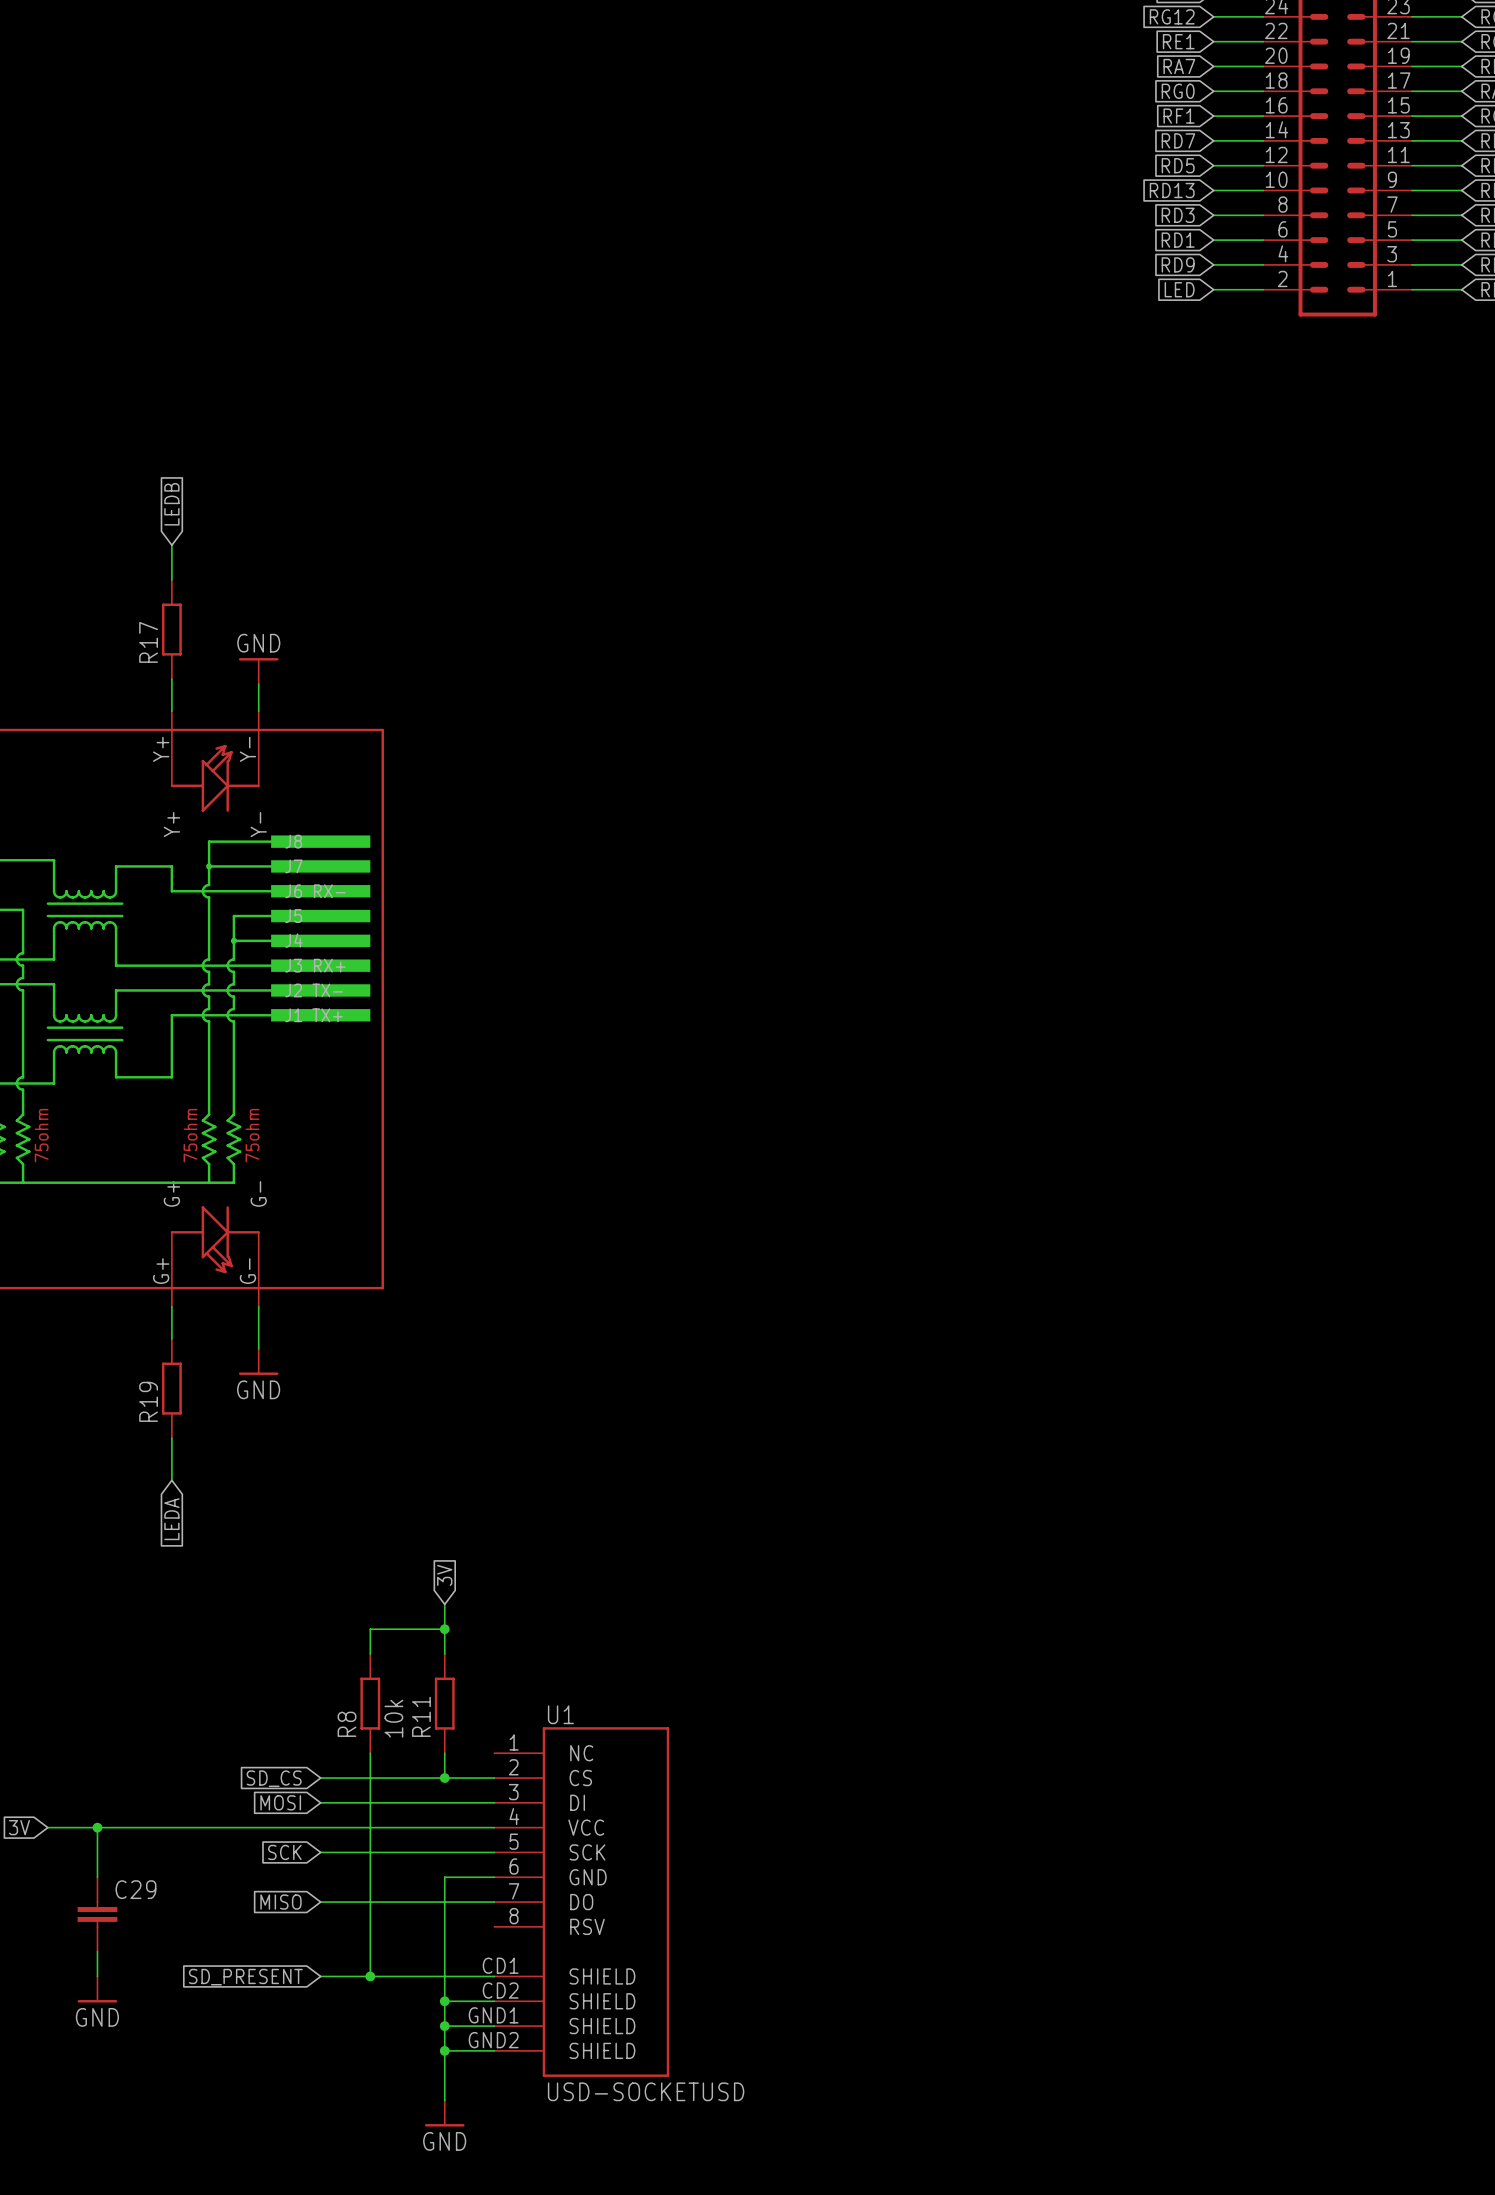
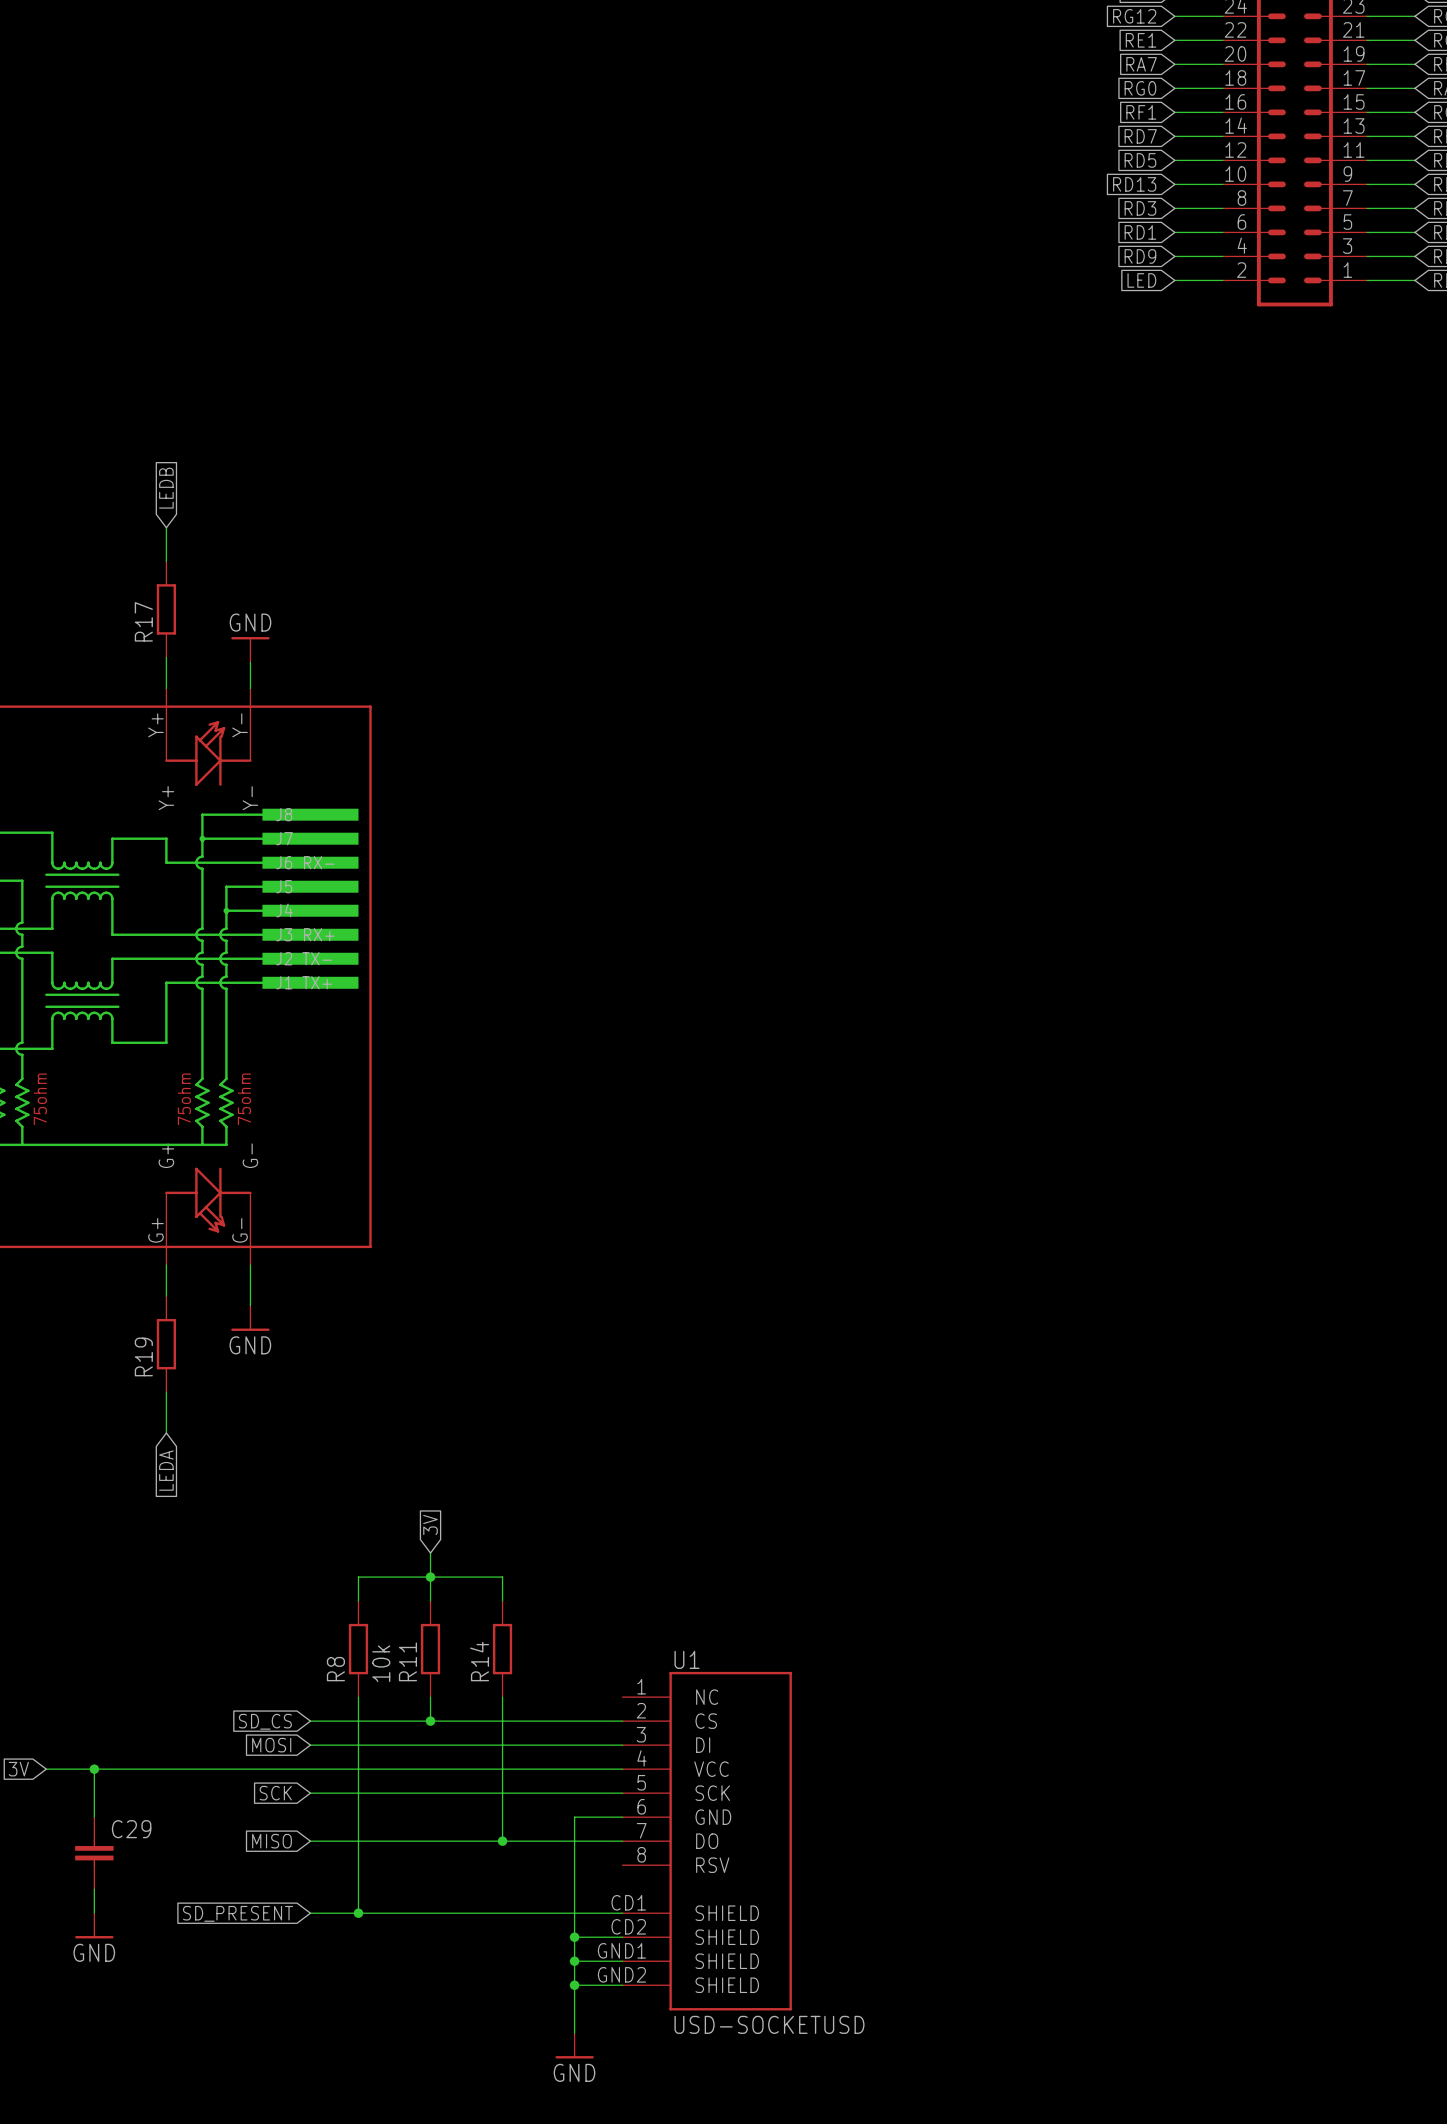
wire: none -> (430, 1577) (502, 1577) (502, 1601)
R14: none -> (502, 1649)
wire: none -> (502, 1697) (502, 1841)
wire: none -> (478, 1721) (622, 1721)
wire: none -> (478, 1745) (622, 1745)
wire: none -> (478, 1769) (622, 1769)
wire: none -> (478, 1793) (622, 1793)
wire: (494, 1877) (444, 1877) (444, 2100) -> (622, 1817) (574, 1817) (574, 2033)
wire: none -> (478, 1841) (622, 1841)
junction: none -> (502, 1841)
U1 position: (581, 1902) -> (707, 1841)
wire: none -> (478, 1913) (622, 1913)
wire: (444, 2001) (494, 2001) -> (574, 1937) (622, 1937)
junction: (444, 2001) -> none
junction: none -> (574, 1937)
wire: (444, 2026) (494, 2026) -> (574, 1961) (622, 1961)
junction: (444, 2026) -> none
junction: none -> (574, 1961)
wire: (444, 2050) (494, 2050) -> (574, 1985) (622, 1985)
junction: (444, 2050) -> none
junction: none -> (574, 1985)
power symbol position: GND (444, 2113) -> GND (574, 2045)

